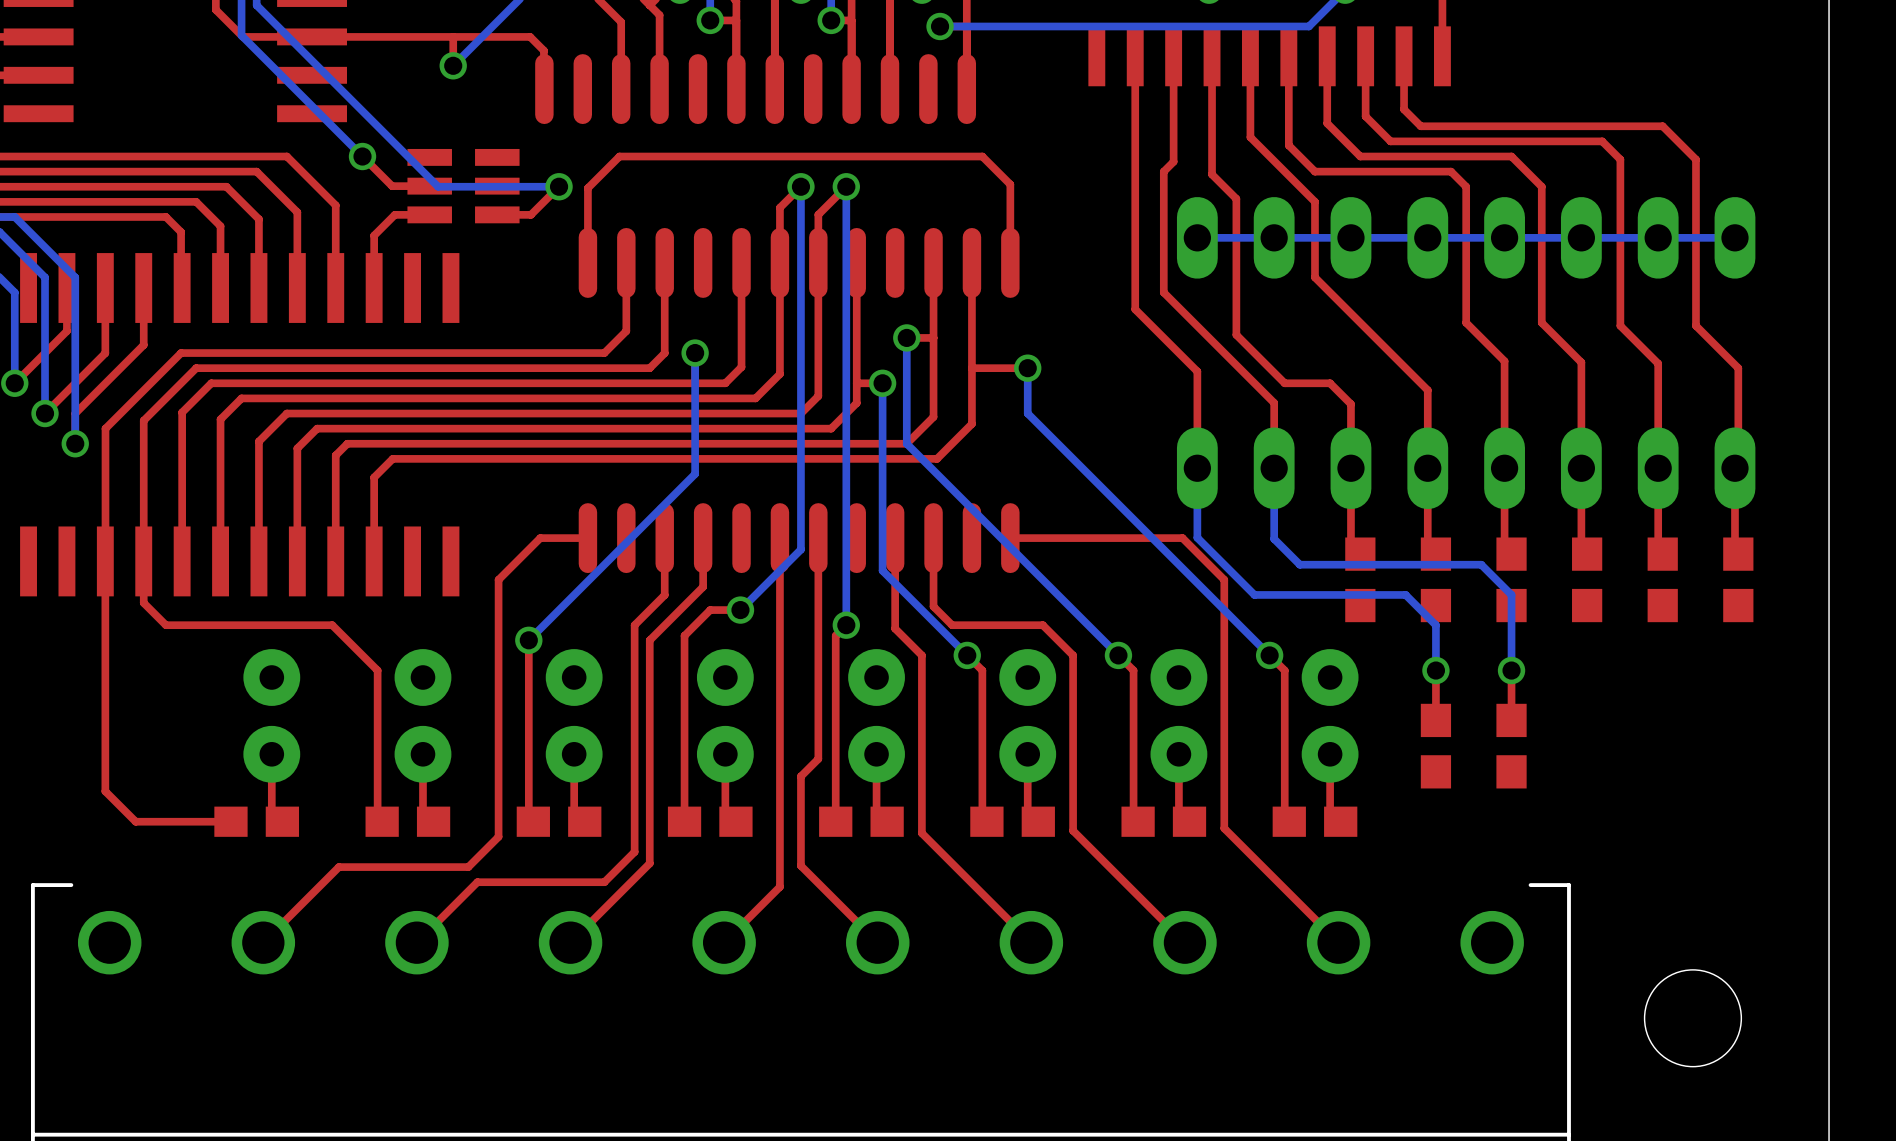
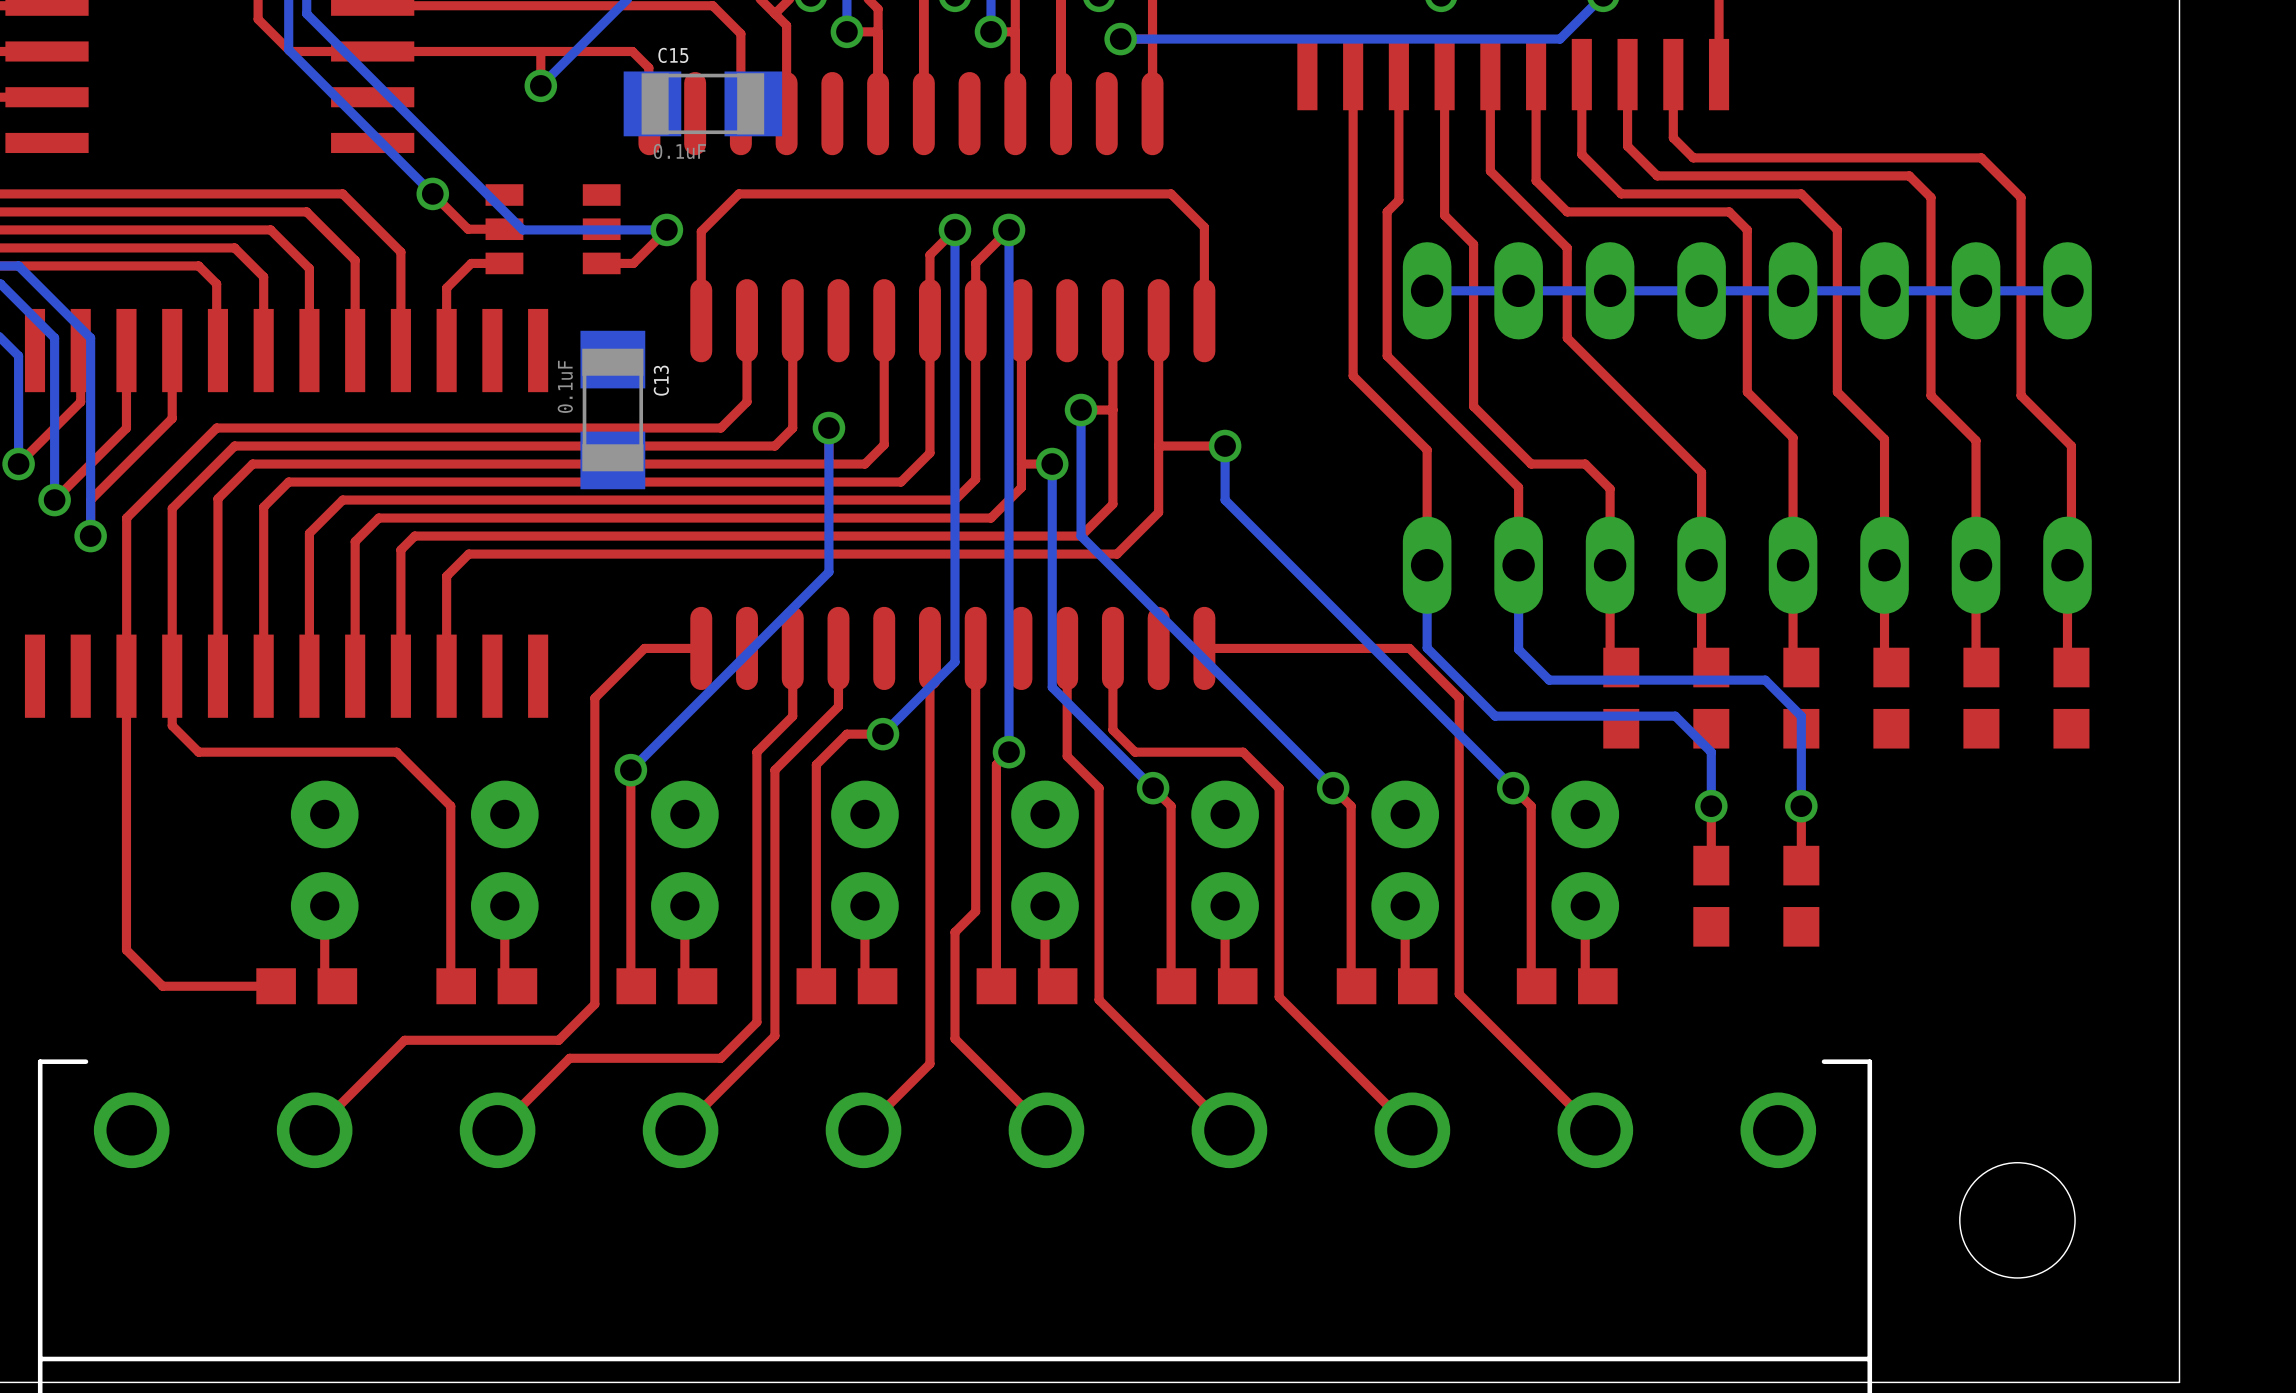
C15: none -> 0.1uF (702, 103)
part footprint: [407, 148, 520, 224] -> [485, 184, 621, 275]
C13: none -> 0.1uF (612, 410)

